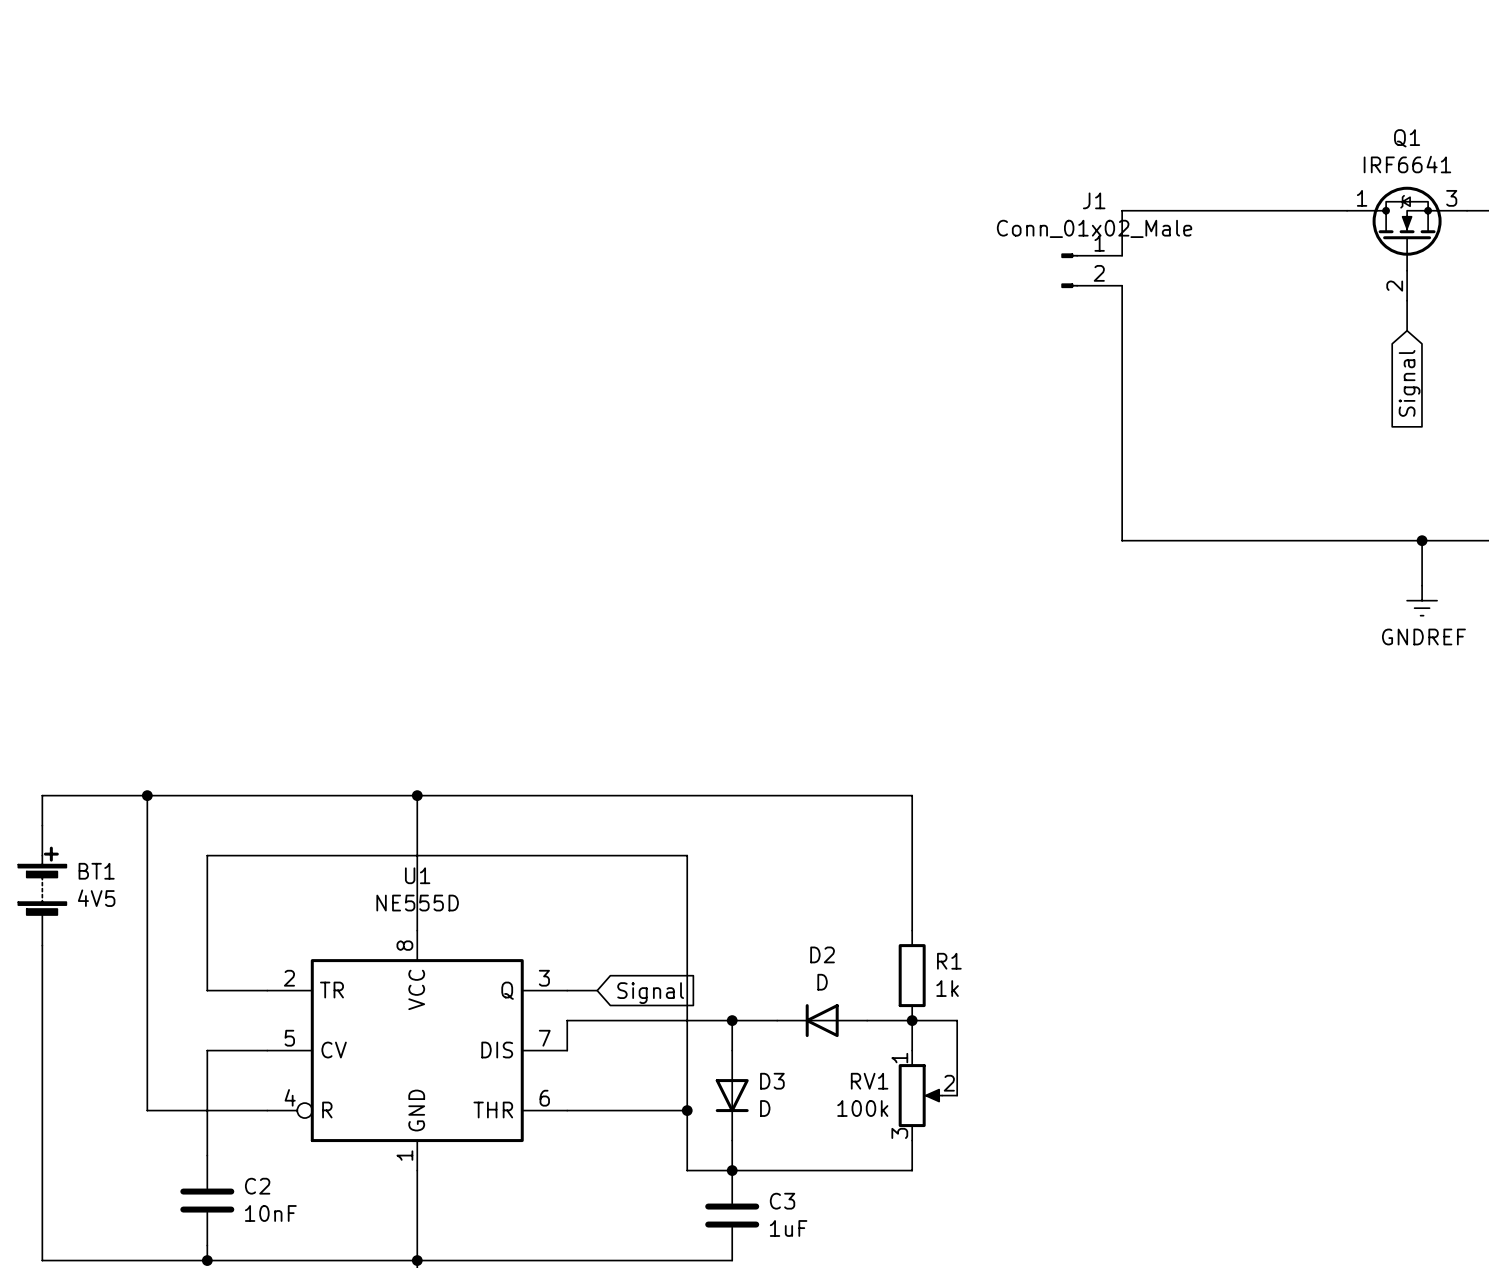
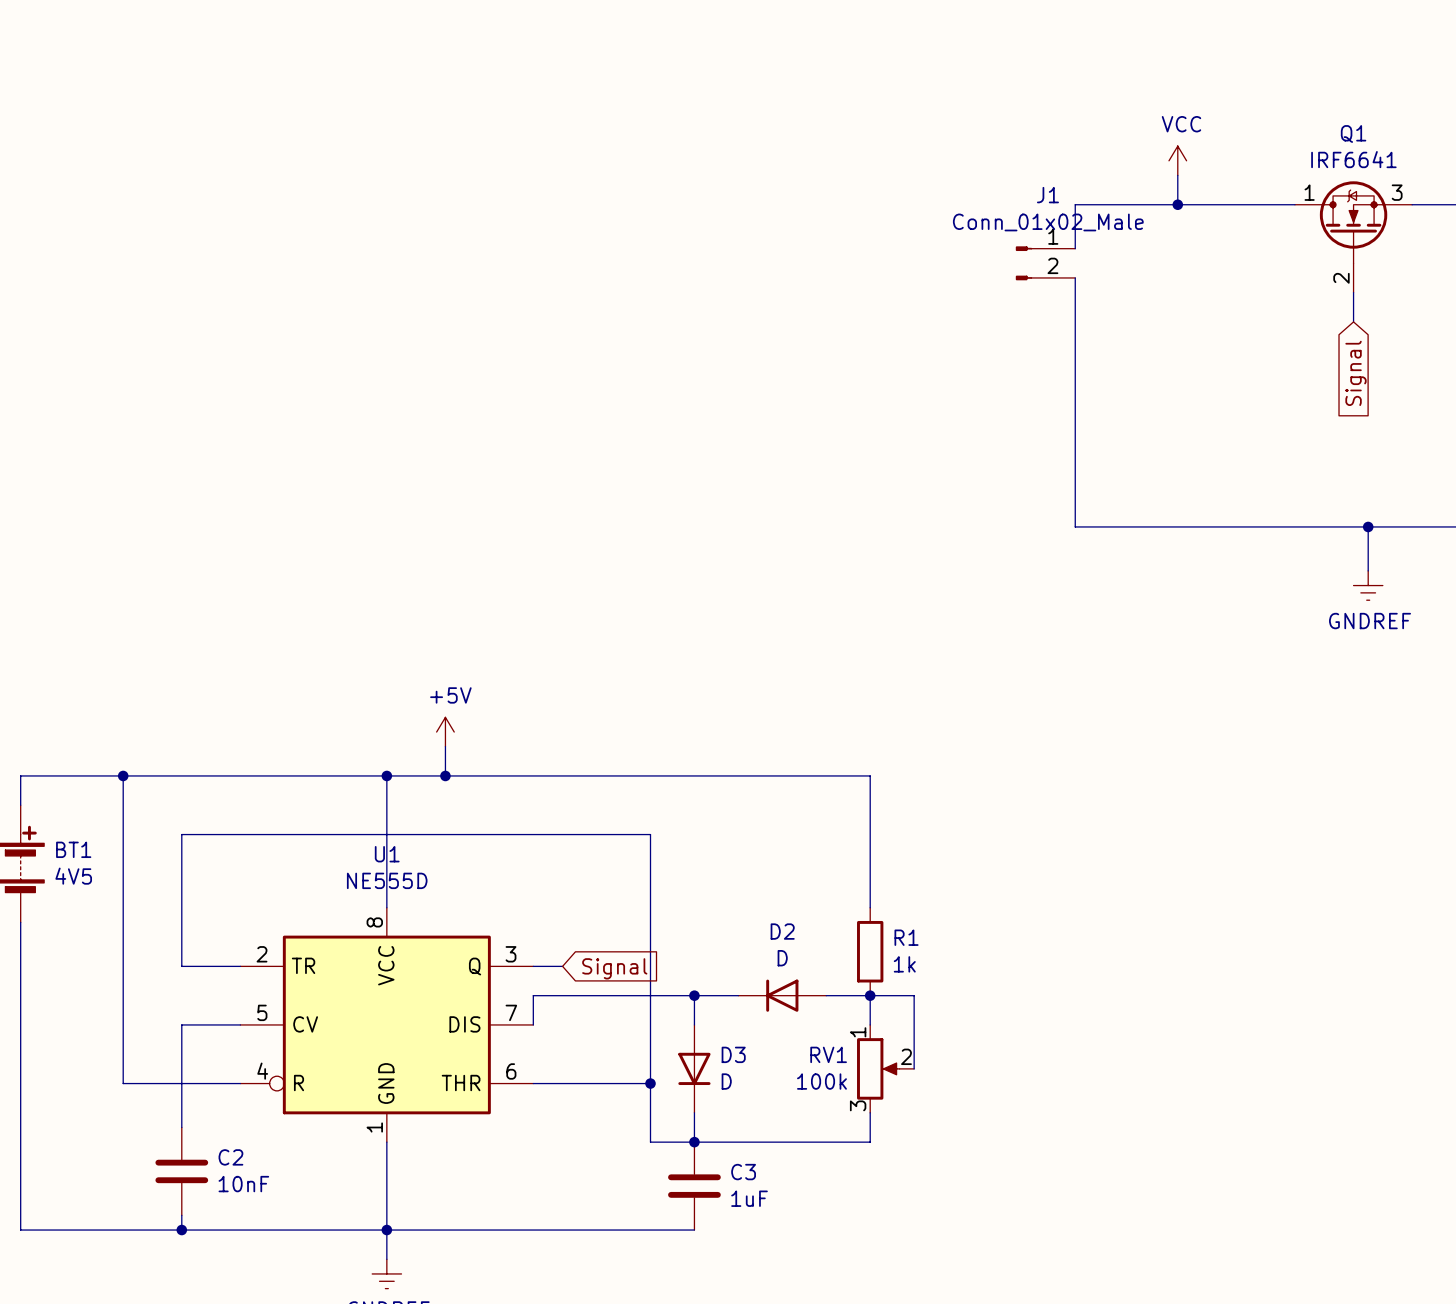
power symbol: none -> VCC (1177, 160)
wire: none -> (1177, 175) (1177, 204)
junction: none -> (1177, 204)
power symbol: none -> +5V (445, 732)
wire: none -> (445, 746) (445, 775)
junction: none -> (445, 775)

